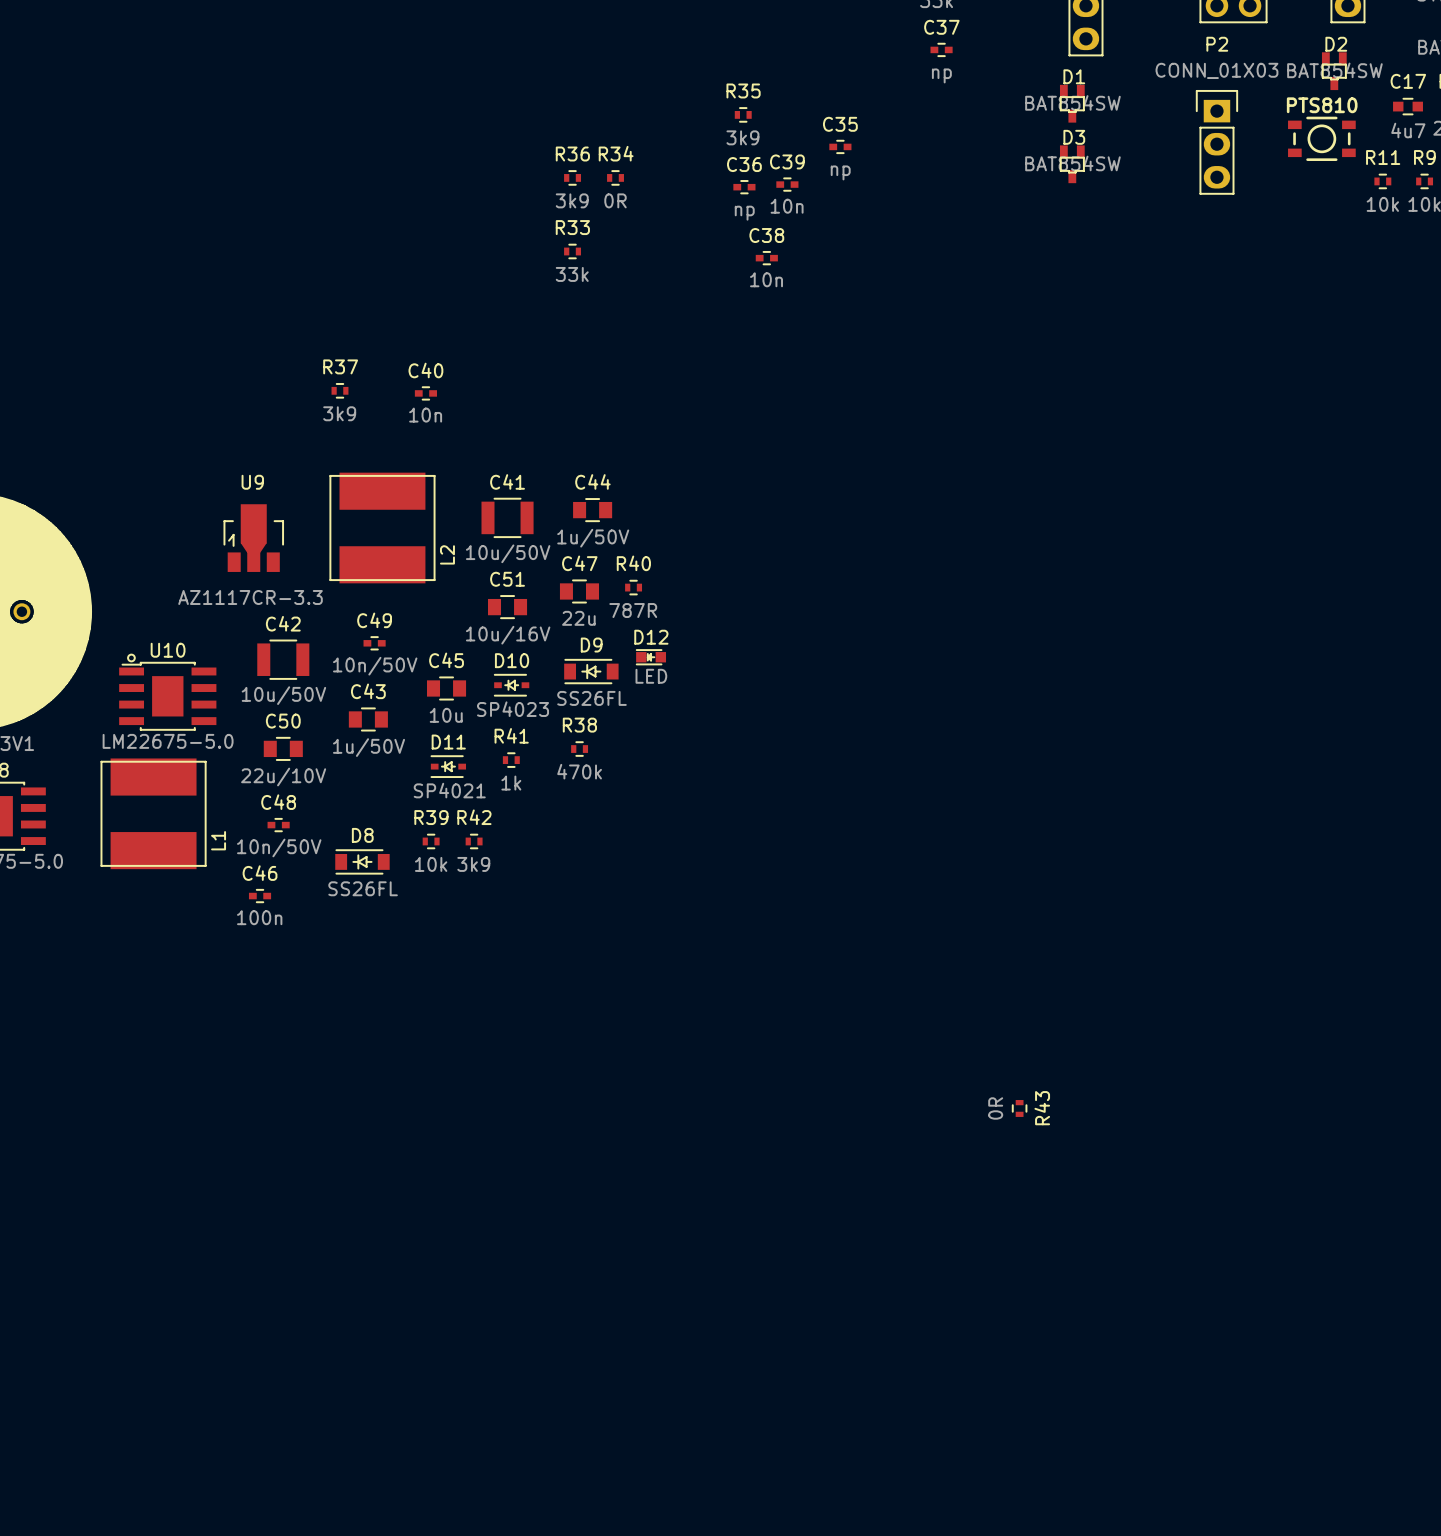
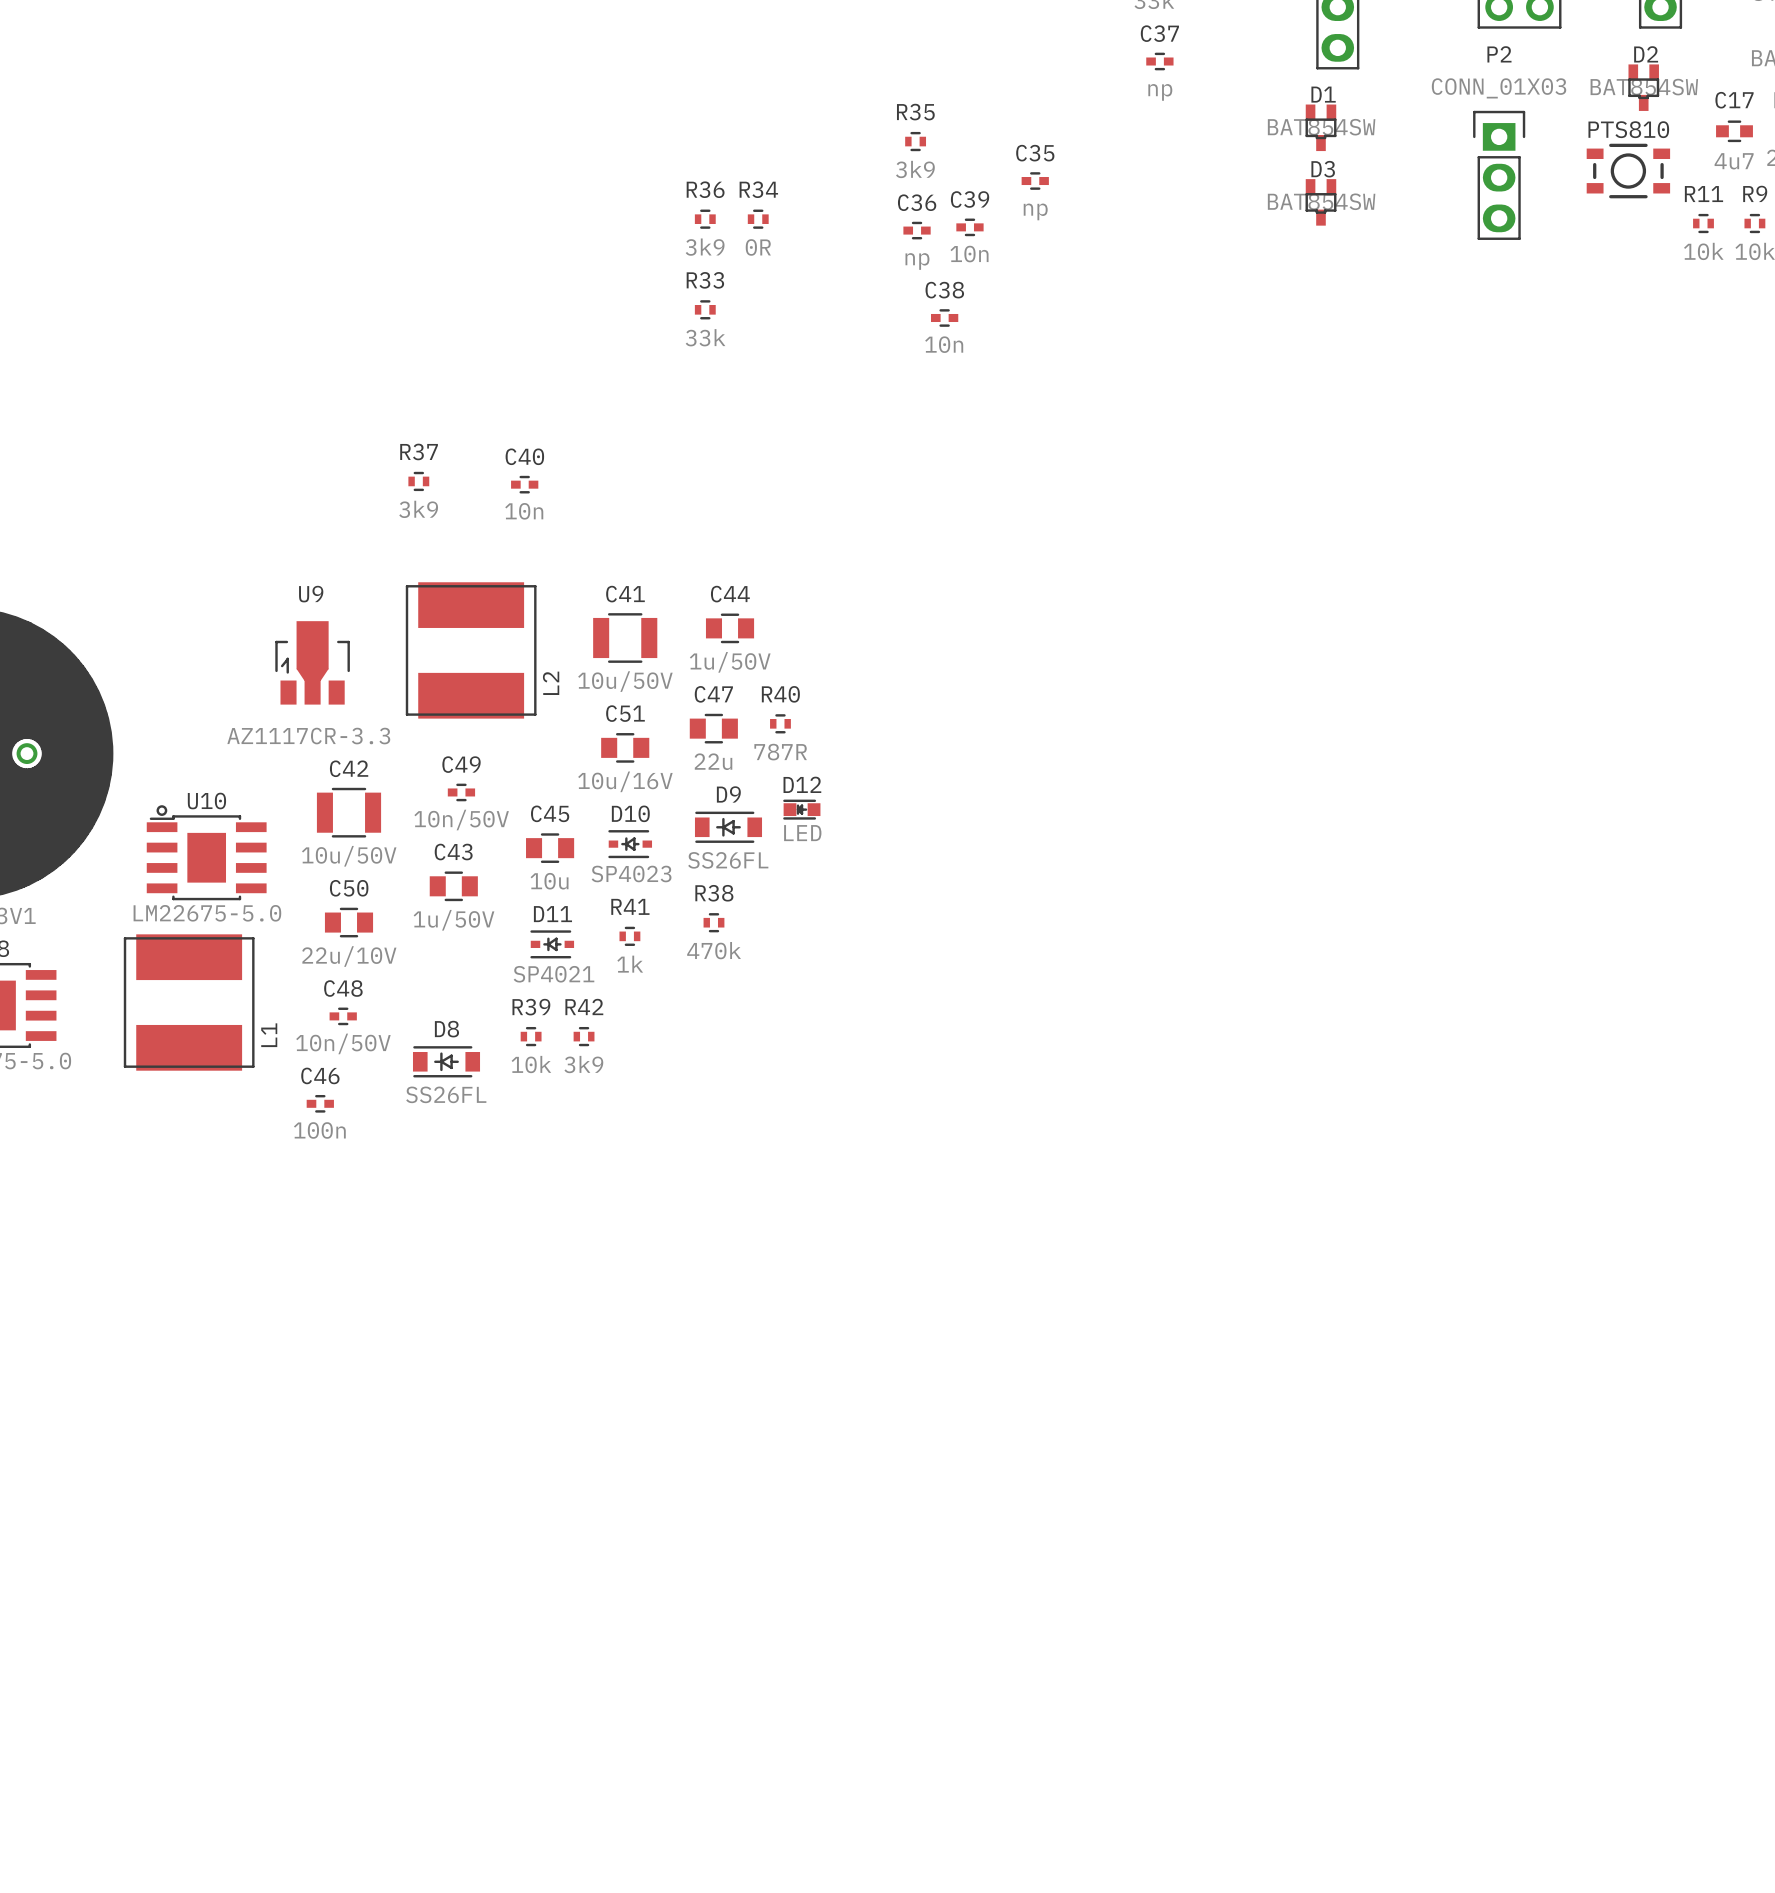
R43: 0R (1019, 1108) -> none

